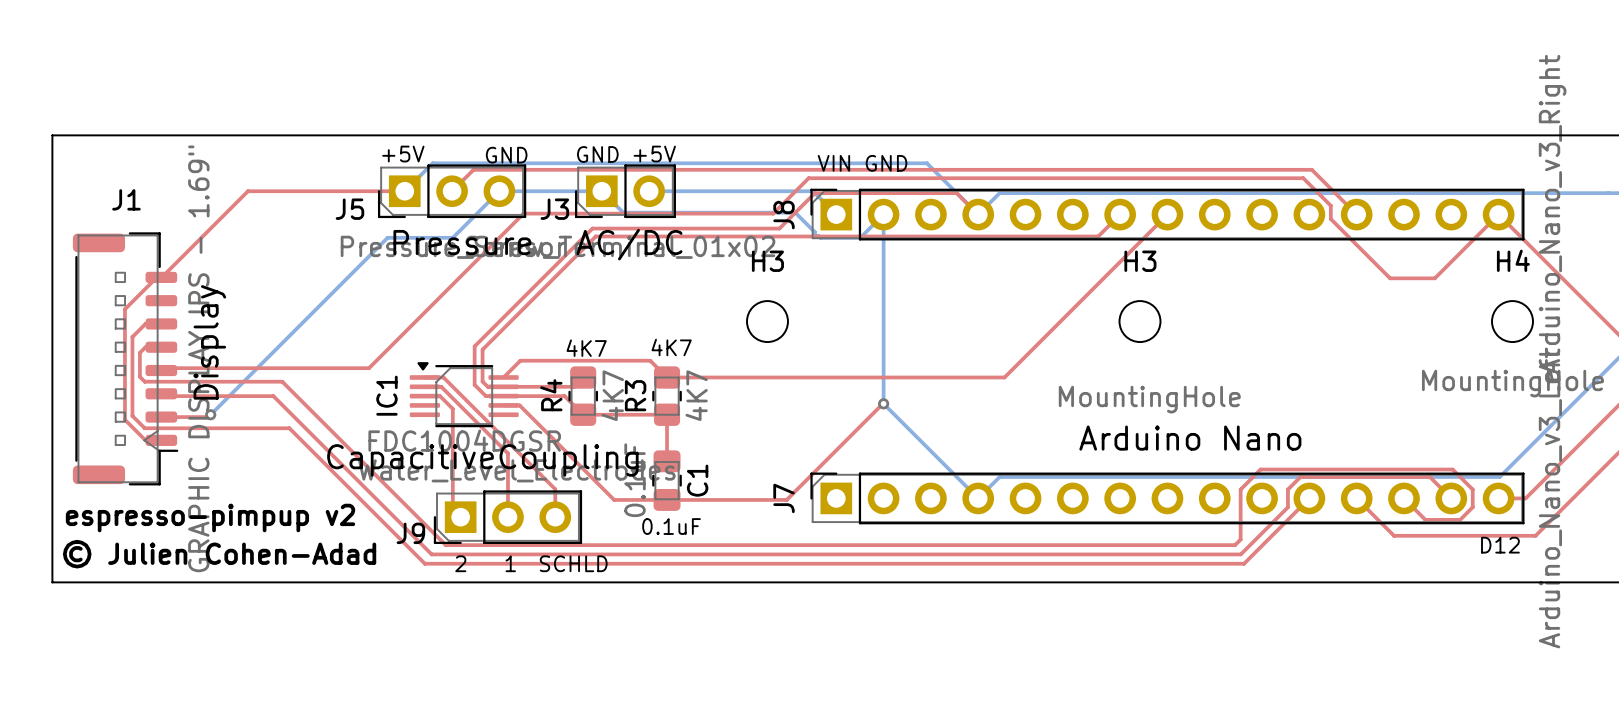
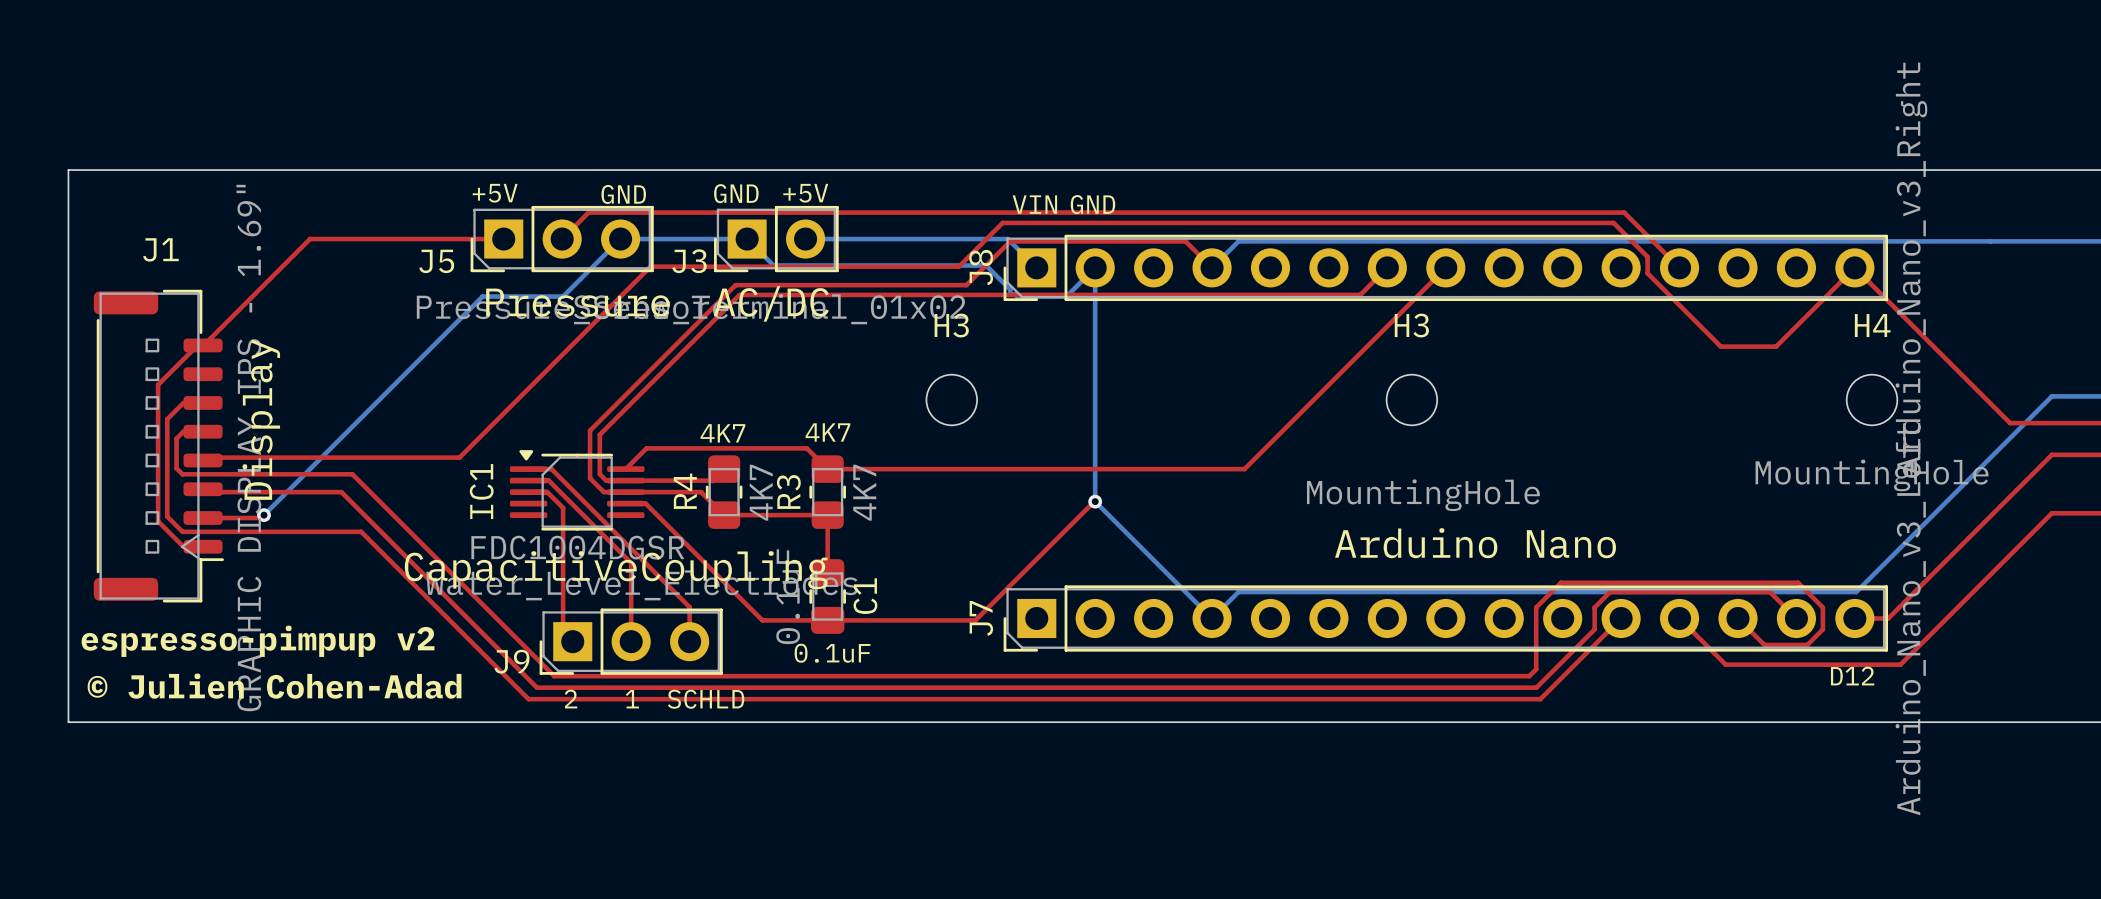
J8 footprint: [810, 188, 1525, 241] -> [1003, 234, 1889, 302]
bottom track: (404, 191) (432, 163) (926, 163) (978, 214) -> none
J7 footprint: [810, 472, 1525, 525] -> [1003, 585, 1889, 652]

